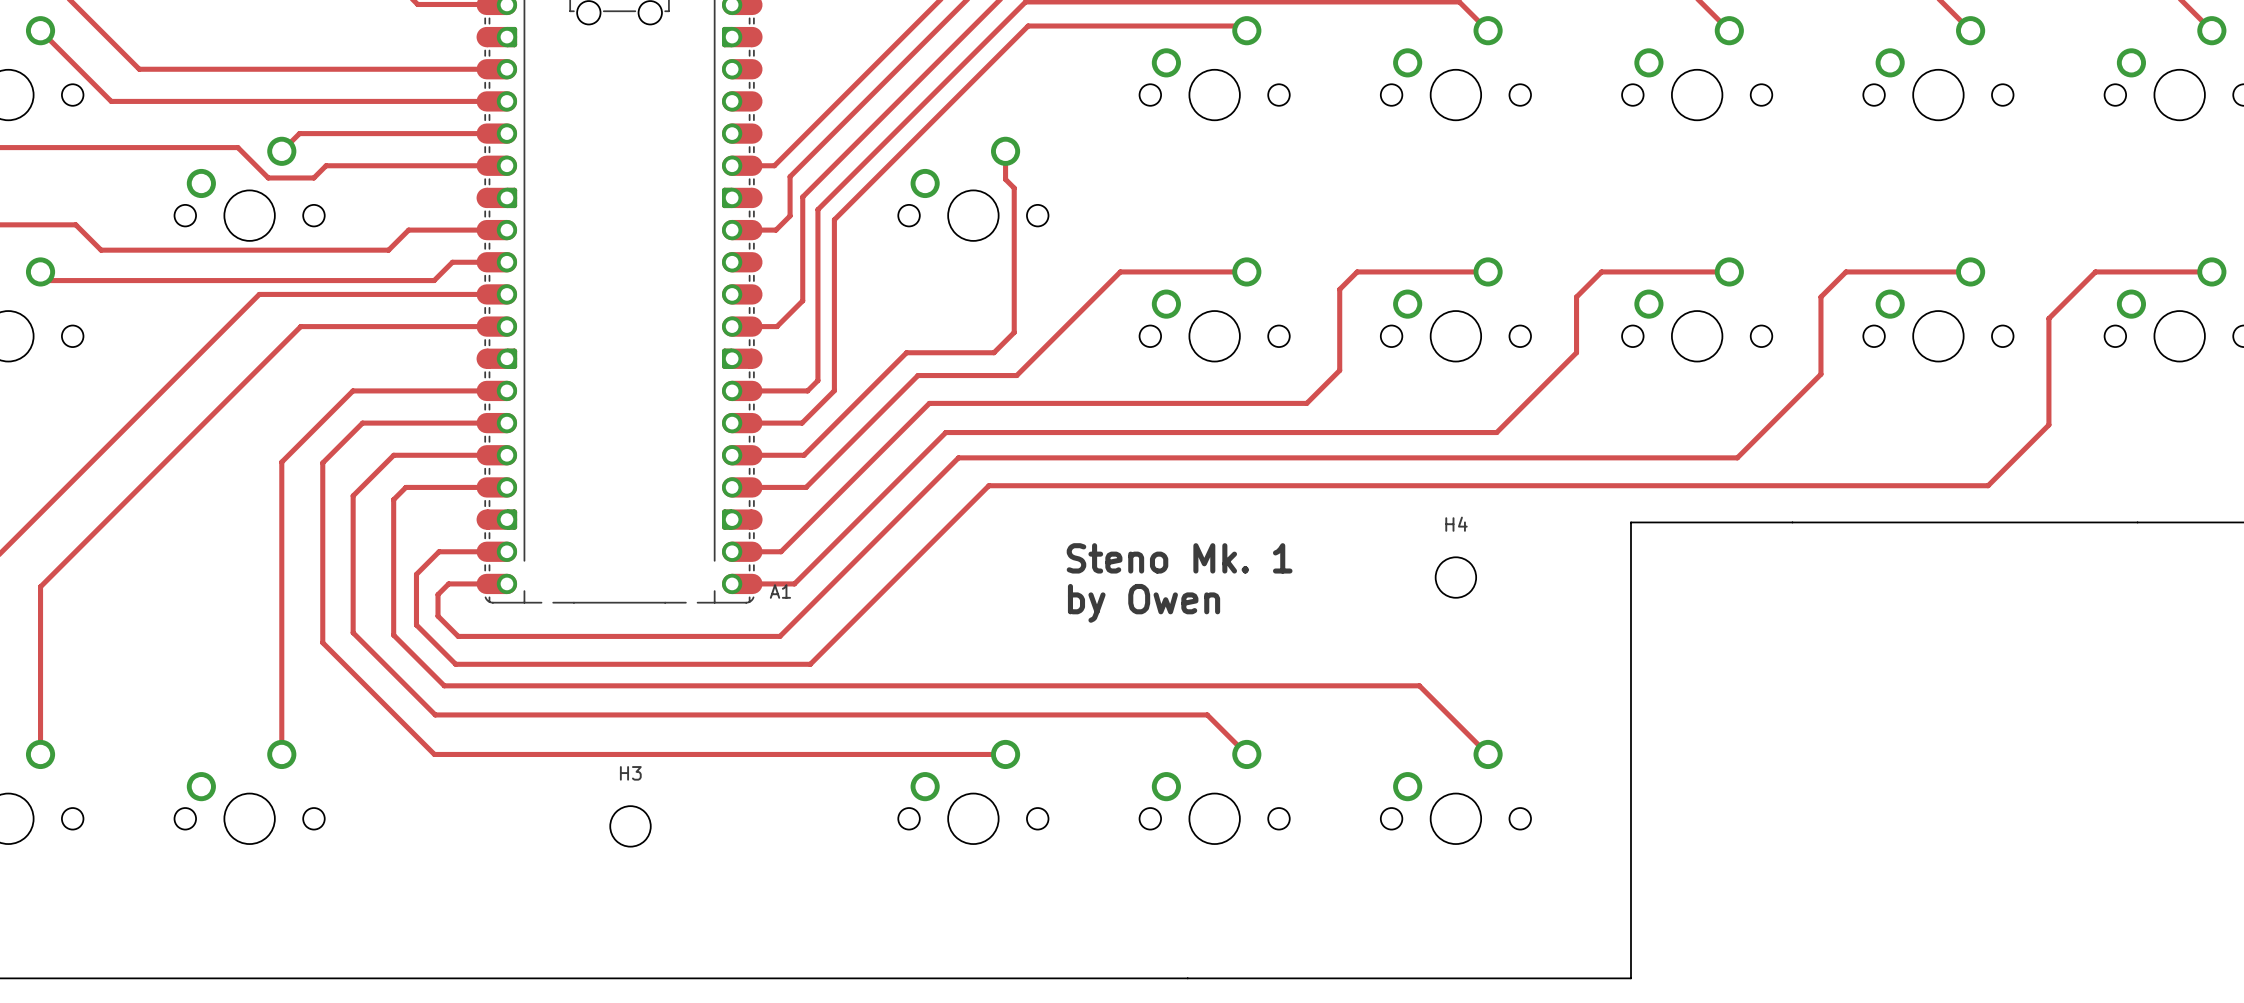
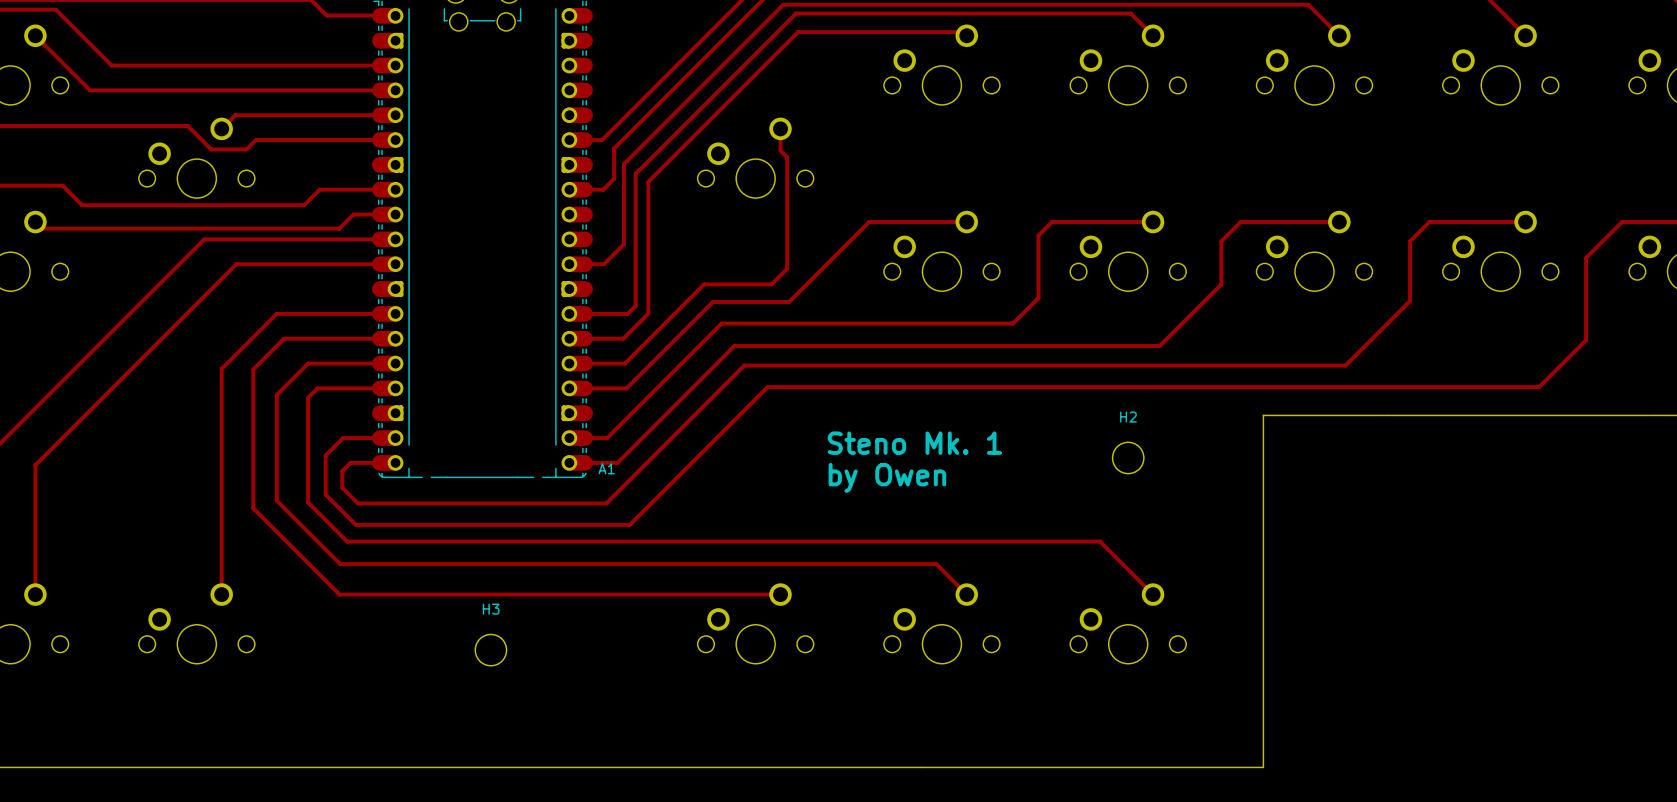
H4 name: H4 (1456, 524) -> H2 (1128, 417)

